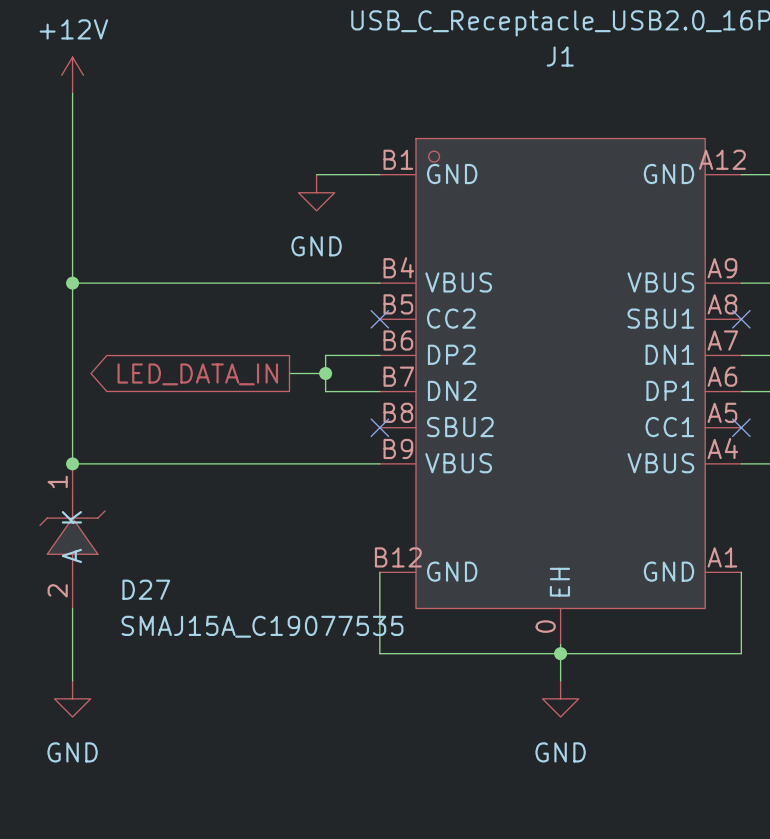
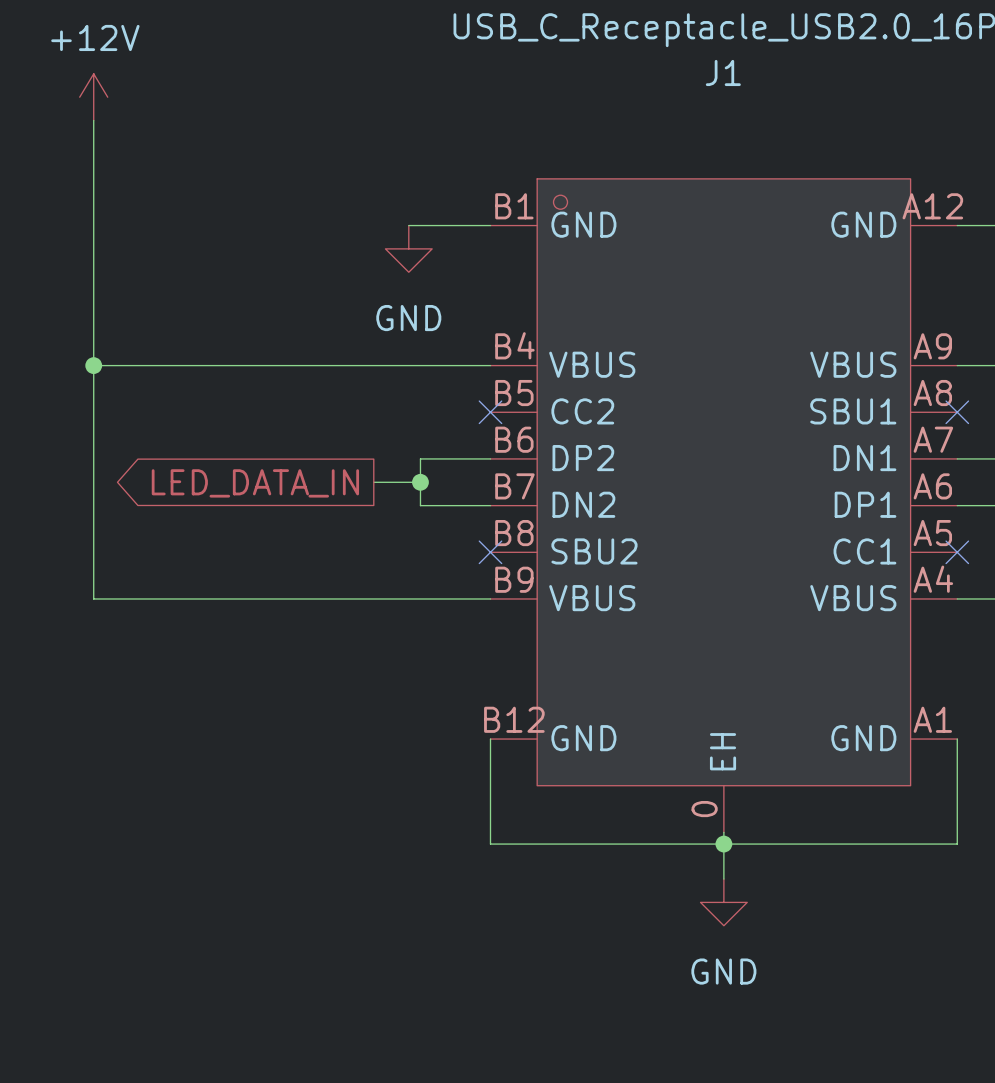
junction: (72, 463) -> none
D27: SMAJ15A_C19077535 (72, 536) -> none
wire: (72, 608) (72, 680) -> none
power symbol: GND (72, 698) -> none

